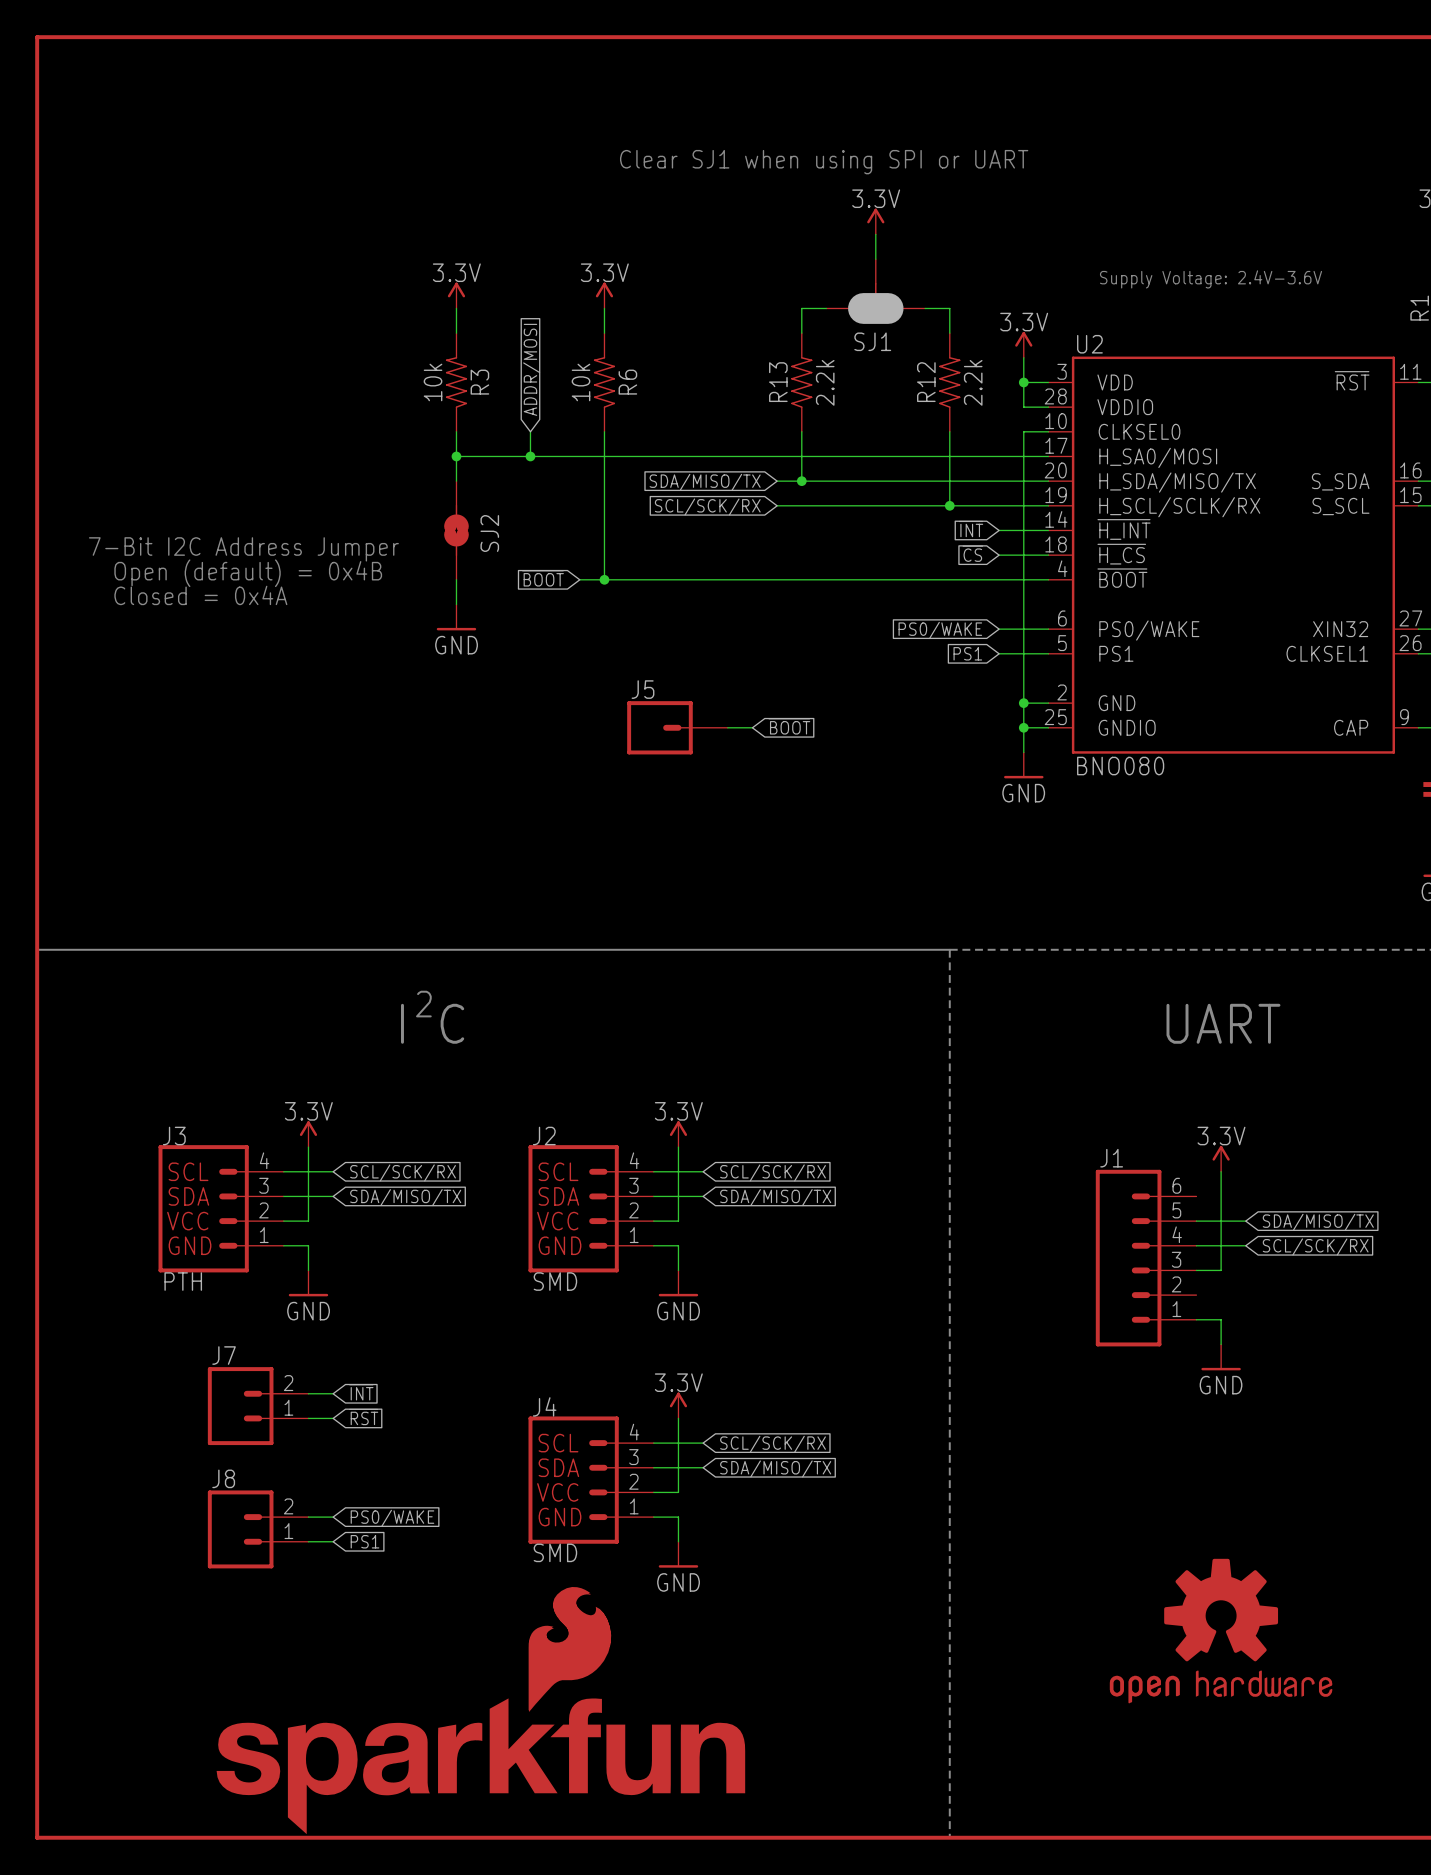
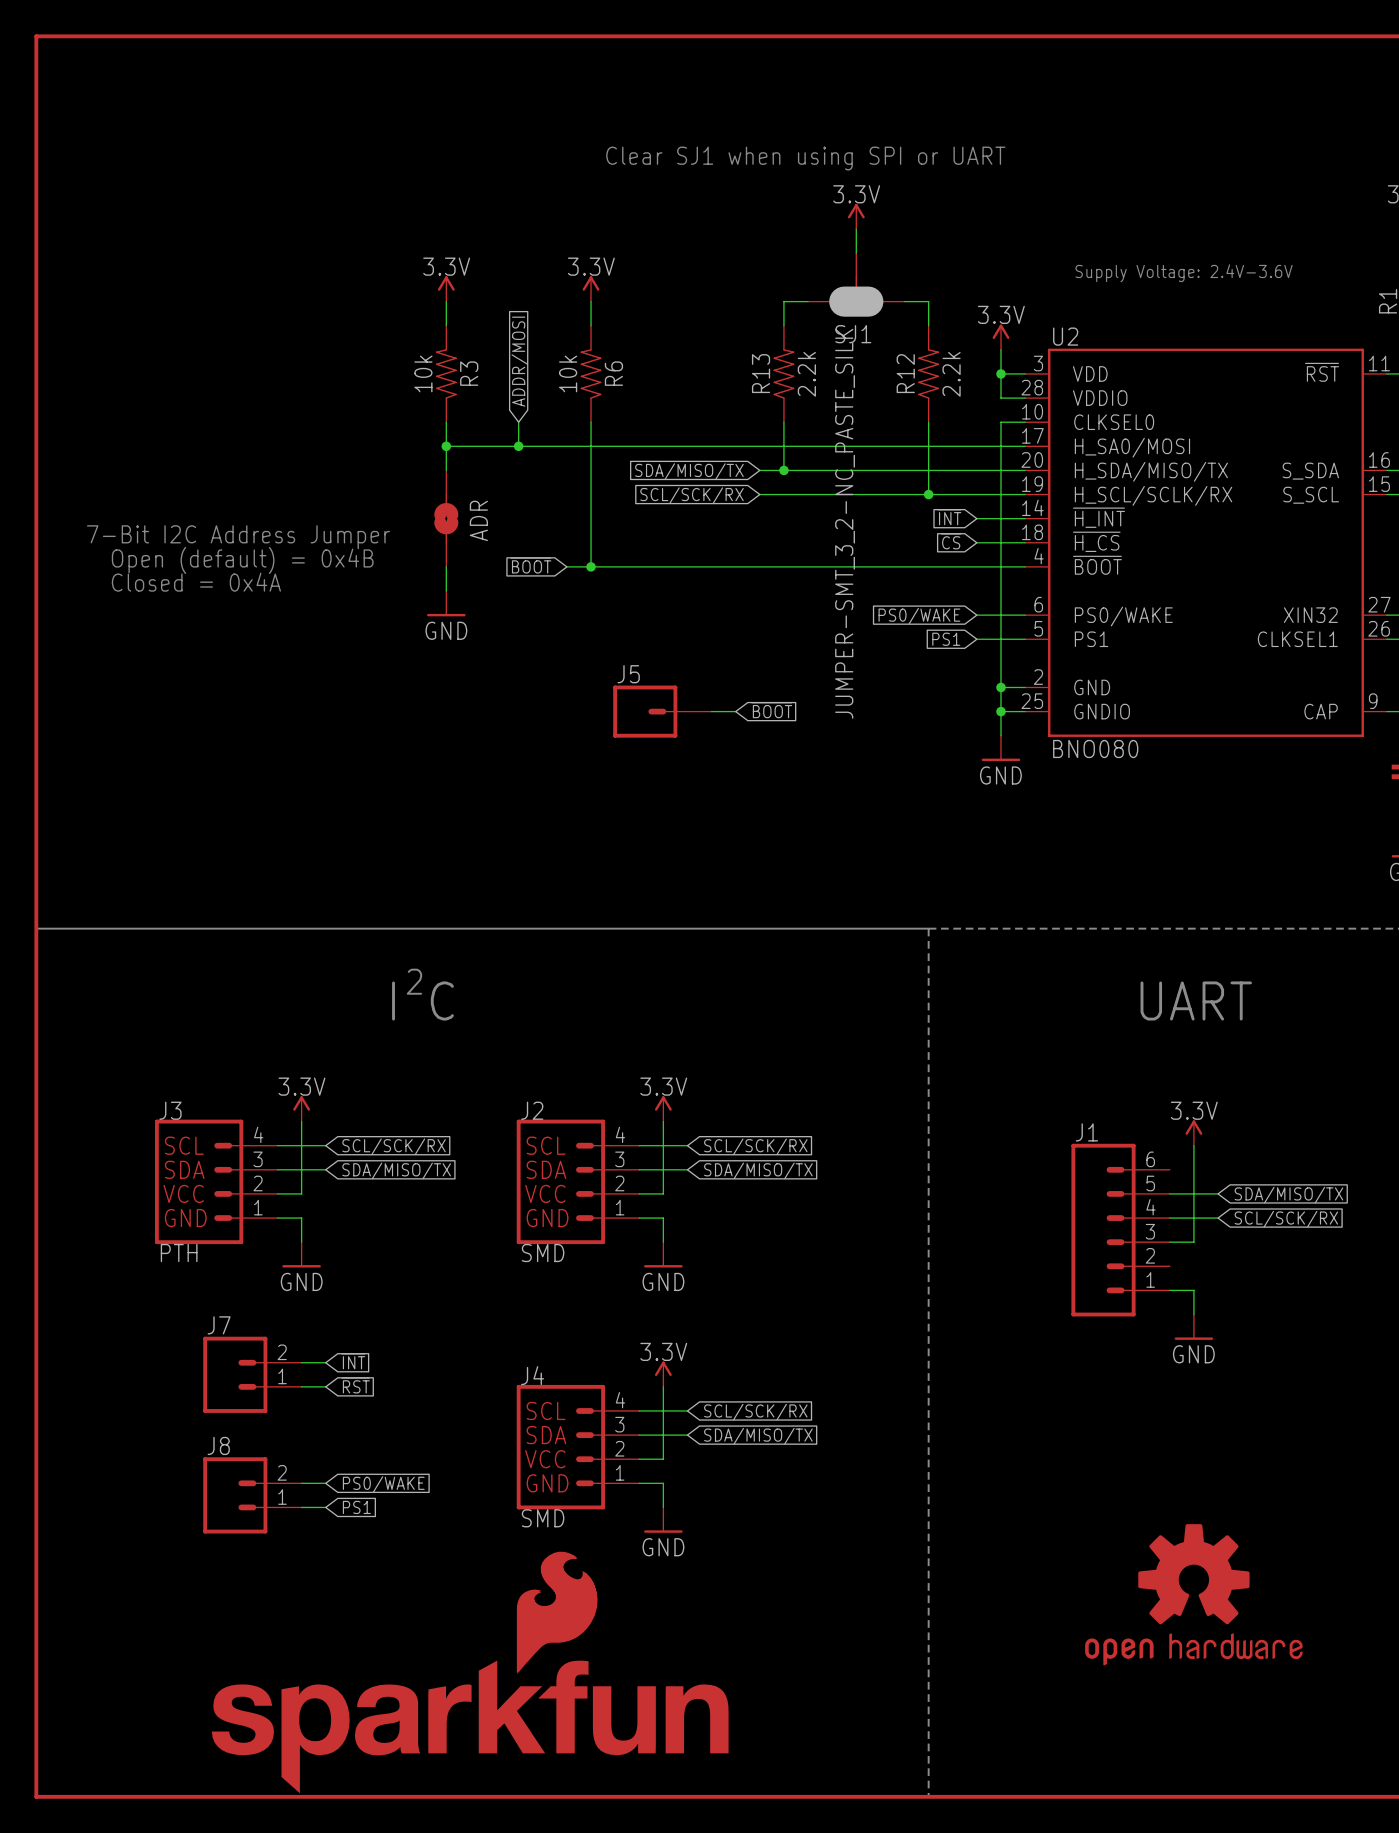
SJ2 name: SJ2 (489, 533) -> ADR (478, 520)
SJ1 value: none -> JUMPER-SMT_3_2-NC_PASTE_SILK (845, 523)

